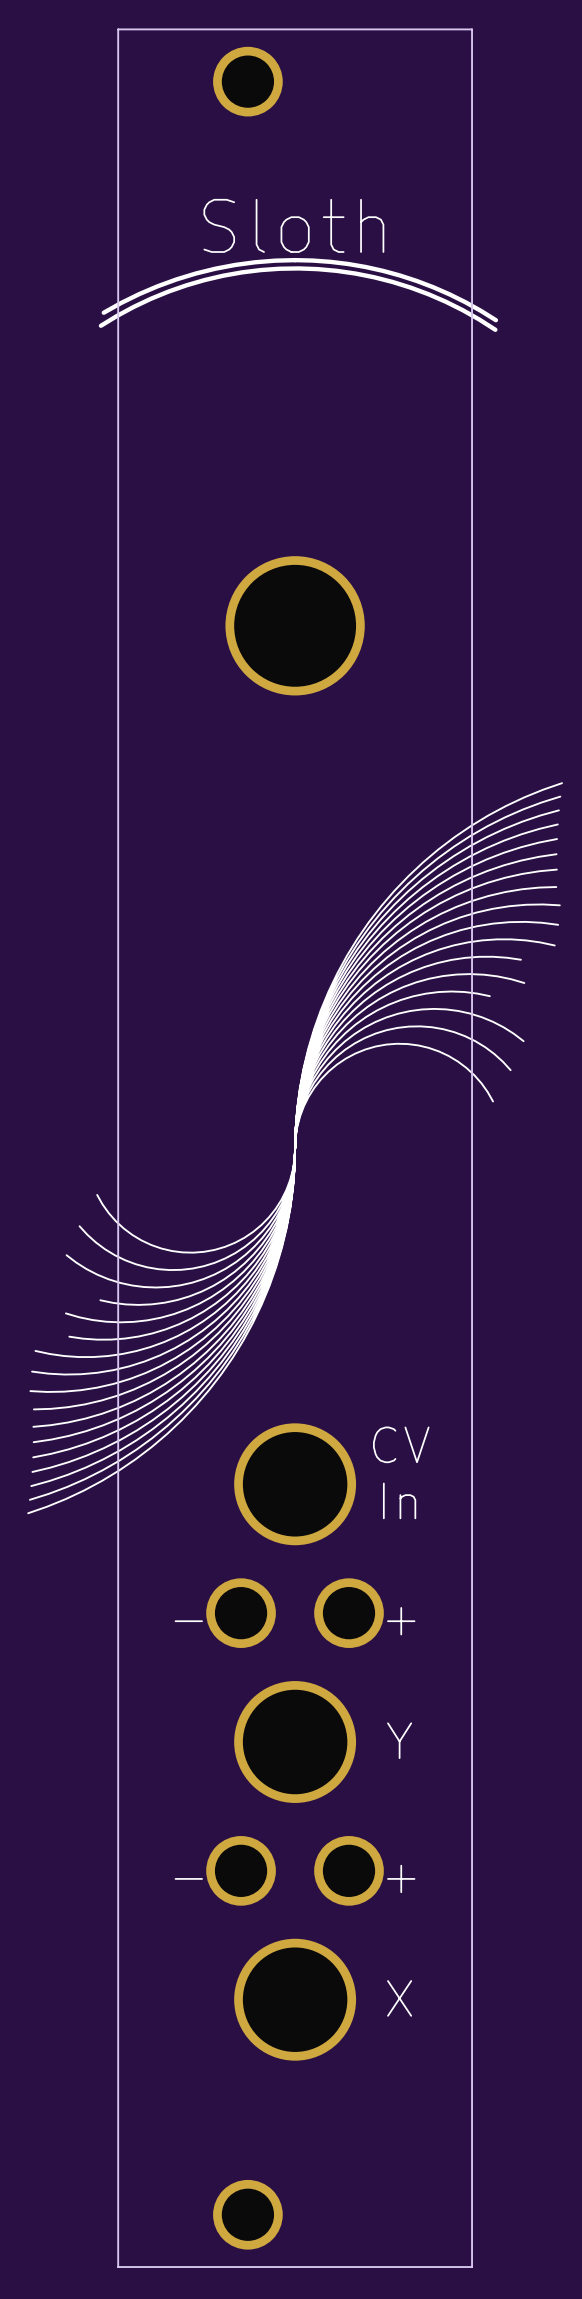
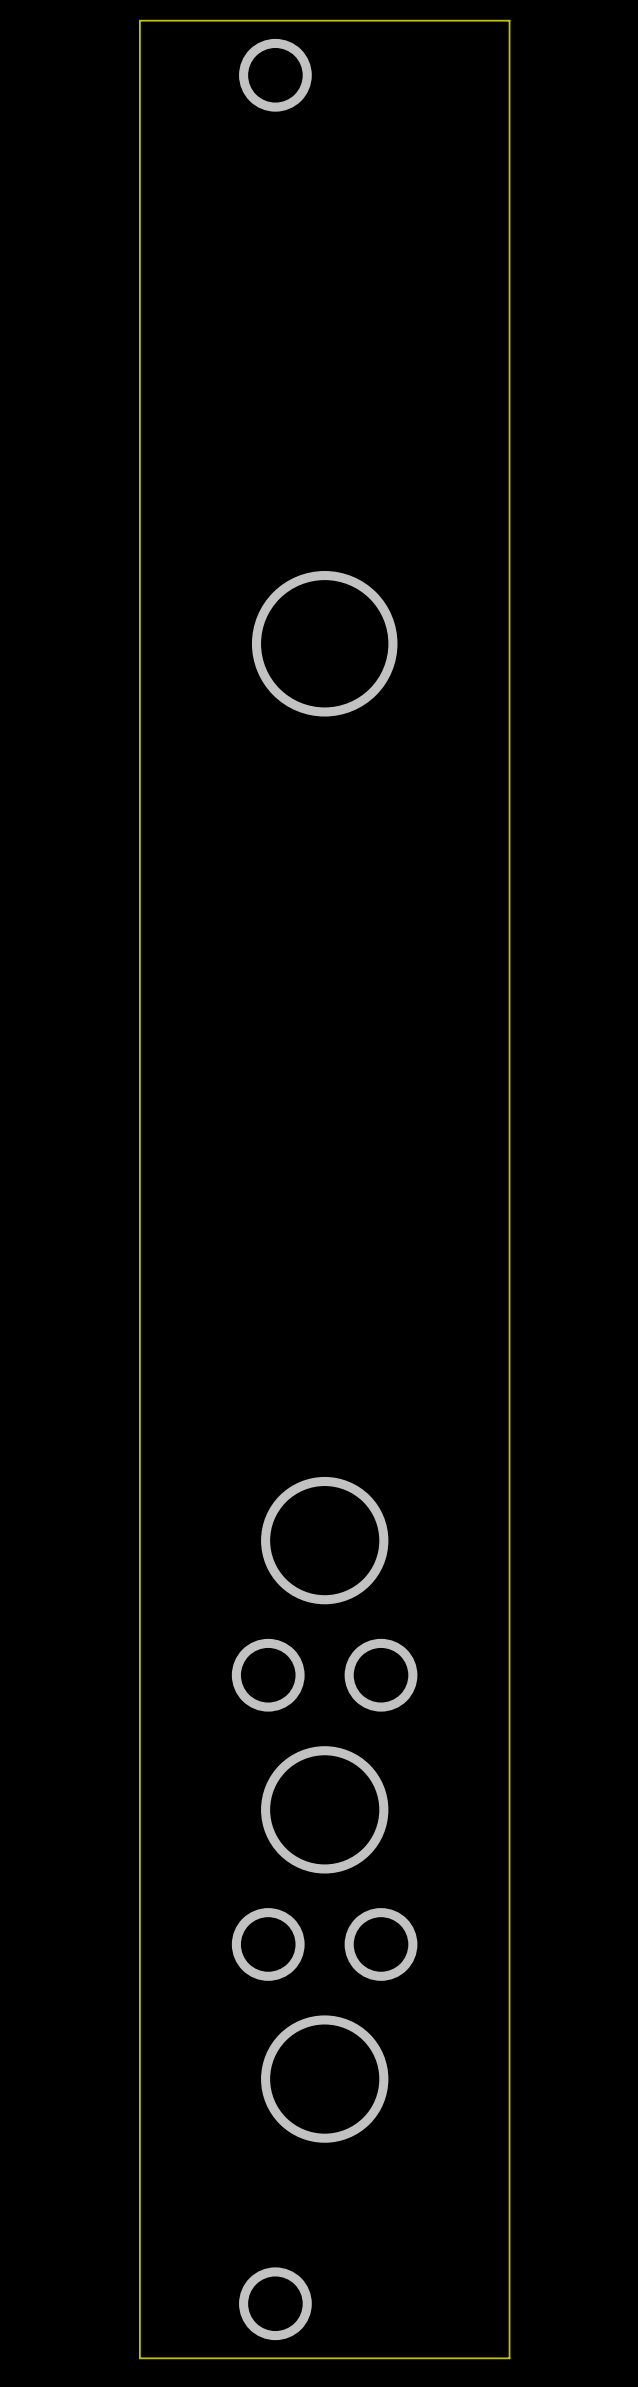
text: Sloth (293, 225) -> none
line: (103, 312) (139, 294) (195, 273) (255, 262) (295, 260) (348, 263) (399, 275) (449, 294) (495, 320) -> none
line: (100, 325) (133, 306) (186, 285) (241, 272) (298, 268) (336, 270) (392, 281) (445, 301) (495, 329) -> none
line: (562, 783) (506, 805) (454, 837) (408, 876) (368, 922) (337, 973) (314, 1029) (299, 1087) (295, 1148) -> none
line: (560, 796) (505, 817) (453, 846) (408, 883) (368, 928) (337, 977) (314, 1032) (299, 1089) (295, 1148) -> none
line: (558, 810) (504, 828) (453, 856) (407, 891) (368, 933) (337, 982) (314, 1034) (299, 1090) (295, 1148) -> none
line: (557, 824) (503, 840) (453, 865) (408, 899) (369, 939) (337, 986) (314, 1037) (299, 1092) (295, 1148) -> none
line: (557, 839) (503, 852) (453, 875) (408, 906) (369, 945) (337, 990) (314, 1040) (299, 1093) (295, 1148) -> none
line: (556, 854) (503, 865) (454, 885) (409, 914) (369, 951) (338, 994) (314, 1042) (299, 1094) (295, 1148) -> none
line: (556, 869) (504, 877) (455, 895) (410, 922) (370, 957) (338, 998) (314, 1045) (300, 1095) (295, 1148) -> none
line: (556, 887) (505, 892) (456, 906) (411, 931) (371, 963) (339, 1003) (314, 1048) (300, 1097) (295, 1148) -> none
line: (559, 905) (509, 906) (460, 917) (414, 938) (374, 968) (340, 1006) (315, 1050) (300, 1098) (295, 1148) -> none
line: (558, 924) (509, 922) (460, 930) (415, 948) (374, 975) (341, 1011) (316, 1053) (300, 1099) (295, 1148) -> none
line: (554, 945) (511, 939) (467, 942) (425, 954) (399, 967) (375, 983) (353, 1003) (335, 1025) (313, 1063) (299, 1104) (295, 1148) -> none
line: (520, 959) (479, 956) (437, 962) (398, 978) (363, 1001) (334, 1031) (313, 1067) (299, 1106) (295, 1148) -> none
line: (524, 983) (484, 974) (442, 976) (403, 987) (367, 1006) (337, 1034) (314, 1068) (299, 1107) (295, 1148) -> none
line: (489, 996) (451, 991) (413, 996) (388, 1004) (355, 1024) (328, 1052) (308, 1085) (299, 1109) (295, 1148) -> none
line: (523, 1041) (503, 1027) (481, 1017) (446, 1009) (409, 1011) (375, 1022) (344, 1041) (327, 1058) (313, 1078) (299, 1112) (295, 1148) -> none
line: (510, 1070) (494, 1054) (475, 1041) (443, 1029) (409, 1026) (375, 1033) (345, 1049) (320, 1073) (303, 1103) (297, 1125) (295, 1148) -> none
line: (493, 1101) (481, 1083) (466, 1067) (438, 1051) (407, 1044) (375, 1046) (355, 1053) (336, 1064) (314, 1087) (300, 1116) (295, 1148) -> none
line: (295, 1148) (290, 1203) (275, 1256) (252, 1305) (220, 1350) (181, 1389) (136, 1420) (86, 1443) (33, 1457) -> none
line: (295, 1148) (290, 1199) (275, 1248) (251, 1293) (218, 1332) (179, 1365) (133, 1389) (84, 1404) (33, 1409) -> none
line: (295, 1148) (290, 1179) (281, 1199) (269, 1217) (244, 1237) (214, 1249) (182, 1252) (151, 1244) (123, 1228) (108, 1213) (97, 1194) -> none
line: (295, 1148) (292, 1173) (281, 1211) (262, 1244) (234, 1271) (201, 1291) (177, 1300) (138, 1304) (100, 1300) -> none
line: (295, 1148) (290, 1201) (275, 1253) (252, 1301) (220, 1344) (181, 1381) (135, 1410) (86, 1431) (33, 1442) -> none
line: (295, 1148) (290, 1182) (276, 1213) (253, 1239) (235, 1253) (214, 1262) (181, 1269) (158, 1269) (135, 1264) (105, 1249) (79, 1226) -> none
line: (295, 1148) (290, 1208) (276, 1267) (252, 1322) (221, 1374) (181, 1420) (135, 1459) (84, 1490) (28, 1513) -> none
line: (295, 1148) (290, 1189) (277, 1229) (255, 1265) (226, 1295) (191, 1318) (152, 1333) (111, 1339) (69, 1336) -> none
line: (295, 1148) (290, 1184) (276, 1217) (254, 1246) (235, 1262) (214, 1274) (192, 1282) (168, 1286) (131, 1285) (97, 1274) (66, 1255) -> none
line: (295, 1148) (290, 1205) (276, 1261) (252, 1314) (221, 1362) (182, 1404) (136, 1440) (85, 1467) (31, 1486) -> none
line: (295, 1148) (289, 1198) (274, 1246) (249, 1290) (216, 1327) (175, 1357) (129, 1378) (80, 1390) (30, 1391) -> none
line: (295, 1148) (290, 1189) (275, 1227) (253, 1261) (222, 1289) (186, 1309) (147, 1320) (106, 1321) (65, 1313) -> none
line: (295, 1148) (290, 1200) (275, 1251) (251, 1297) (219, 1339) (179, 1374) (134, 1400) (85, 1418) (33, 1426) -> none
line: (295, 1148) (290, 1204) (276, 1258) (252, 1310) (221, 1356) (182, 1397) (136, 1430) (86, 1455) (32, 1471) -> none
line: (295, 1148) (289, 1196) (274, 1243) (248, 1285) (215, 1320) (174, 1348) (129, 1366) (80, 1374) (32, 1371) -> none
line: (295, 1148) (290, 1191) (277, 1233) (255, 1271) (236, 1293) (214, 1312) (177, 1336) (150, 1346) (122, 1354) (78, 1357) (35, 1350) -> none
line: (295, 1148) (290, 1207) (276, 1264) (252, 1318) (221, 1368) (182, 1412) (136, 1449) (85, 1479) (29, 1499) -> none
text: CV (401, 1444) -> none
text: In (399, 1500) -> none
text: - (188, 1621) -> none
text: + (401, 1621) -> none
text: Y (399, 1740) -> none
text: - (188, 1878) -> none
text: + (401, 1878) -> none
text: X (399, 1998) -> none

